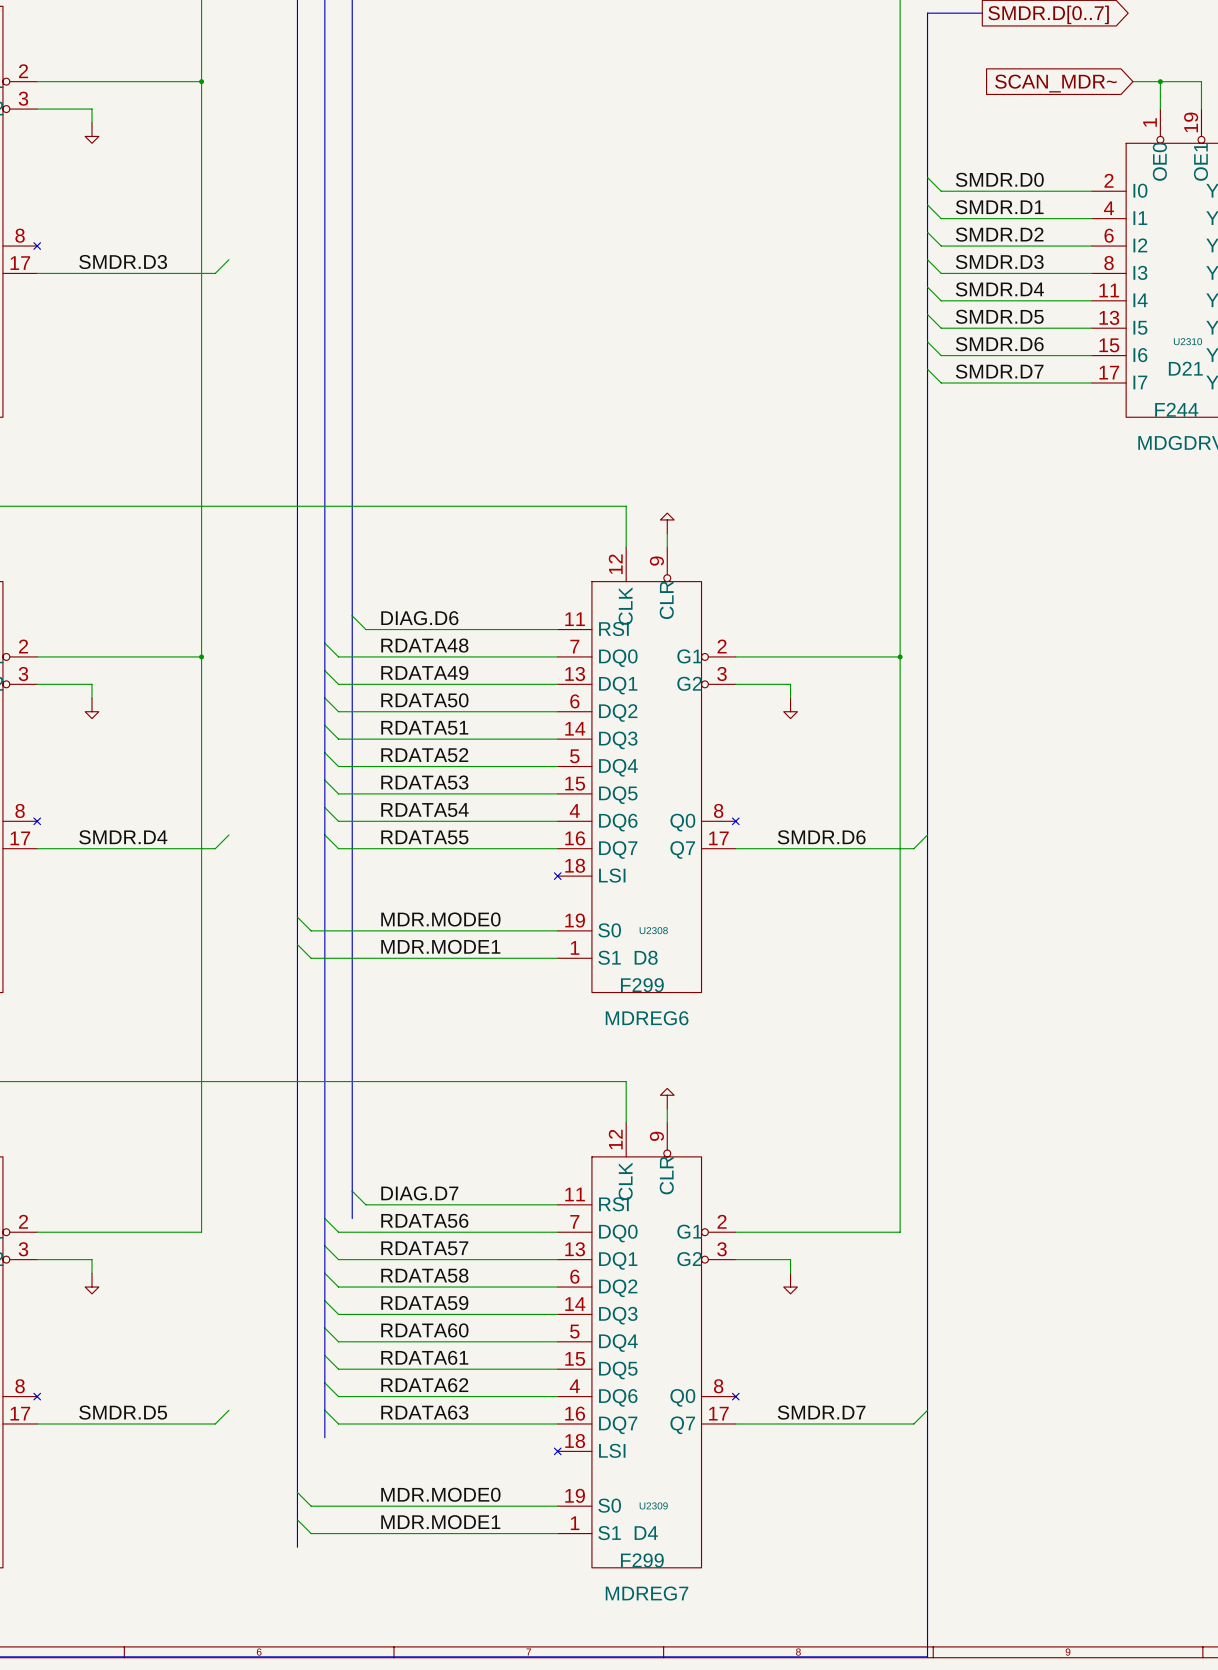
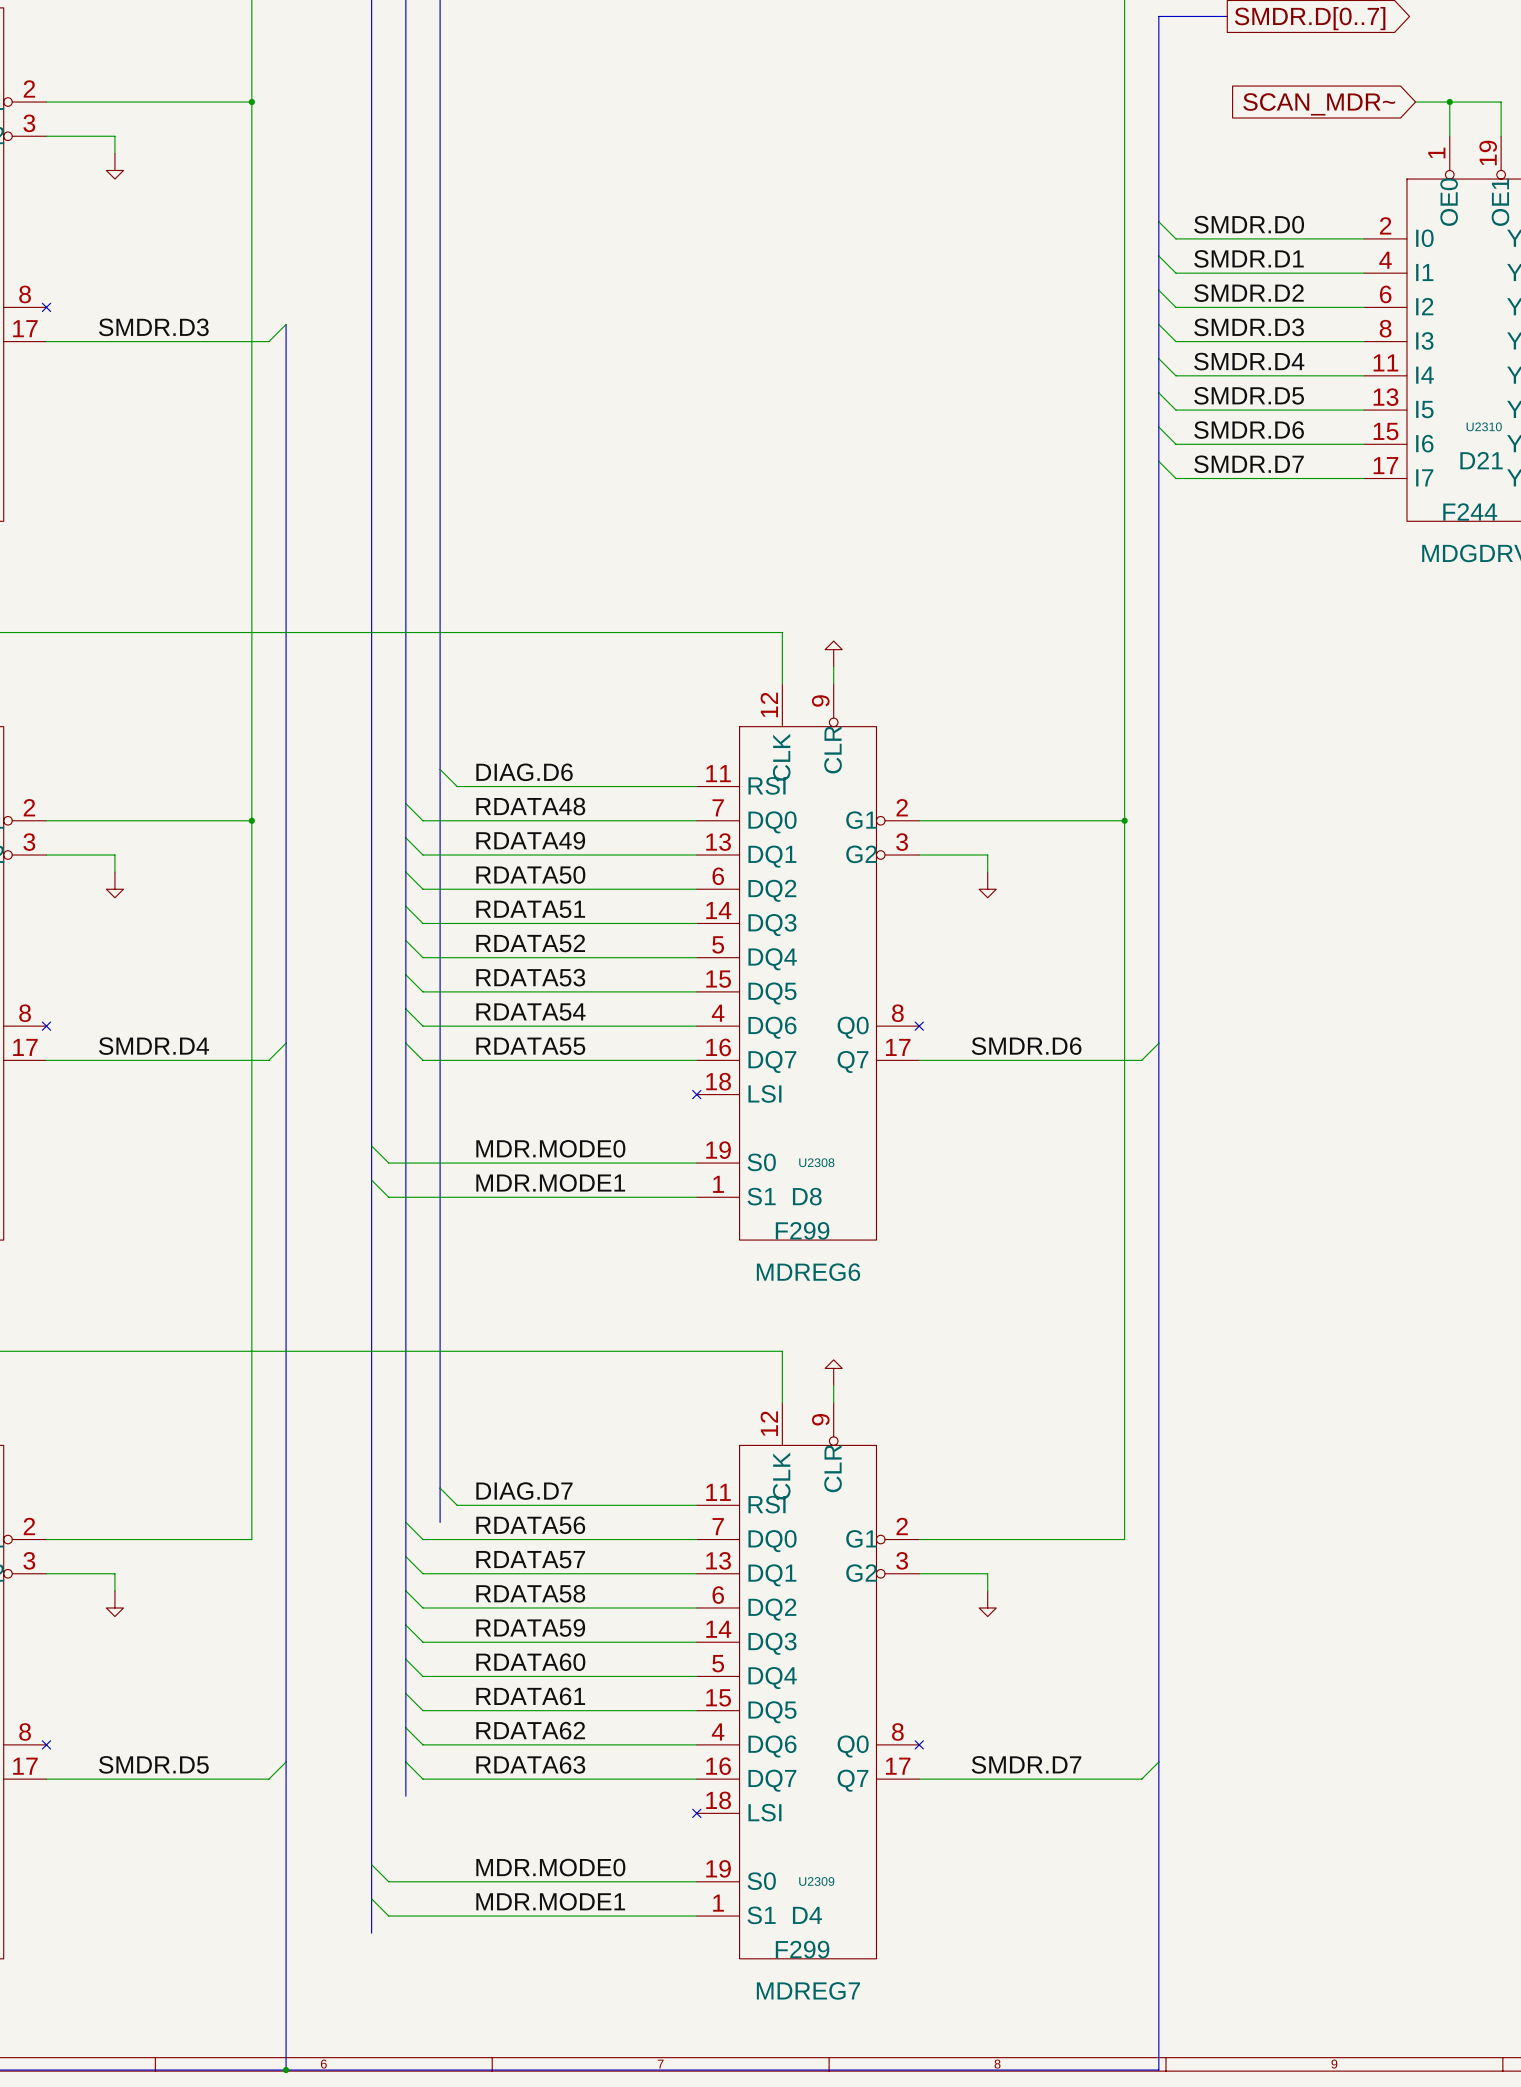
bus: none -> (286, 324) (286, 2070)
junction: none -> (286, 2070)

